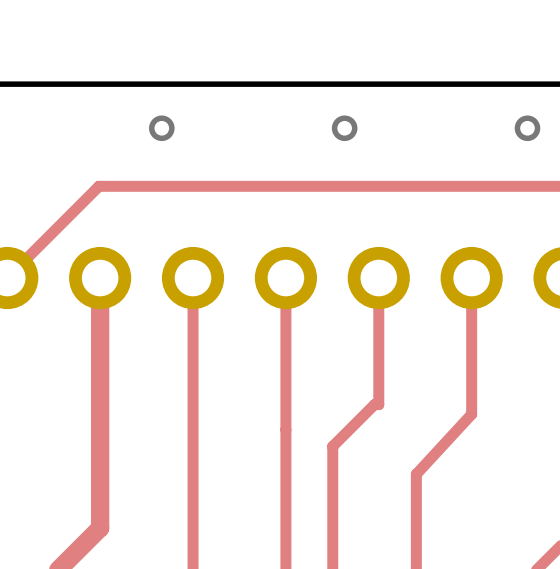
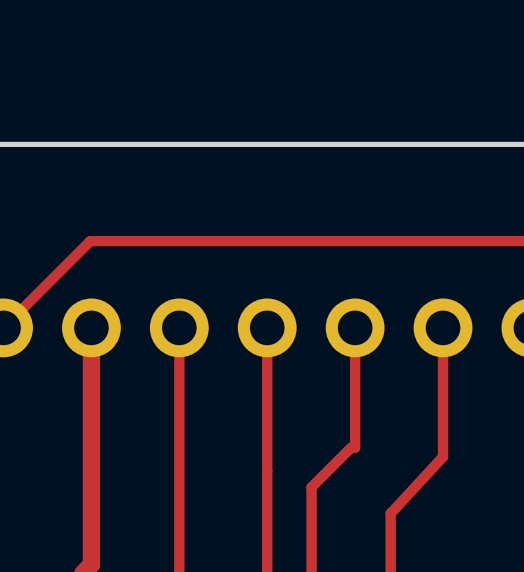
via: (161, 128) -> none
via: (344, 128) -> none
via: (527, 128) -> none

